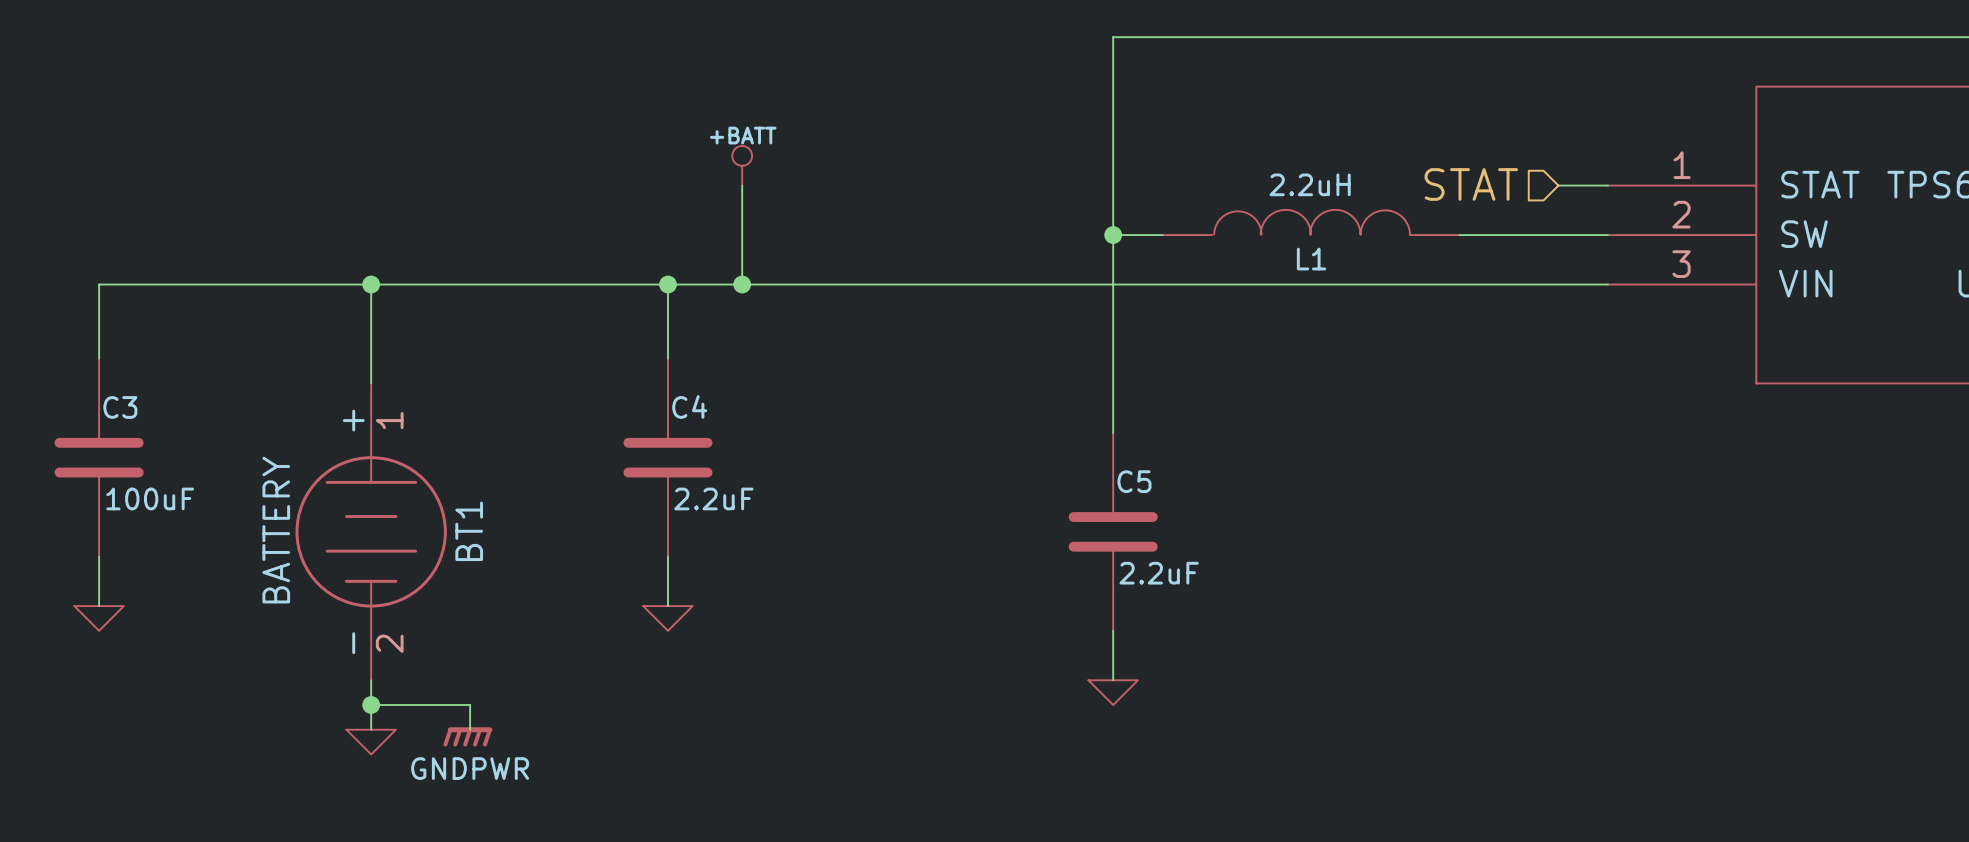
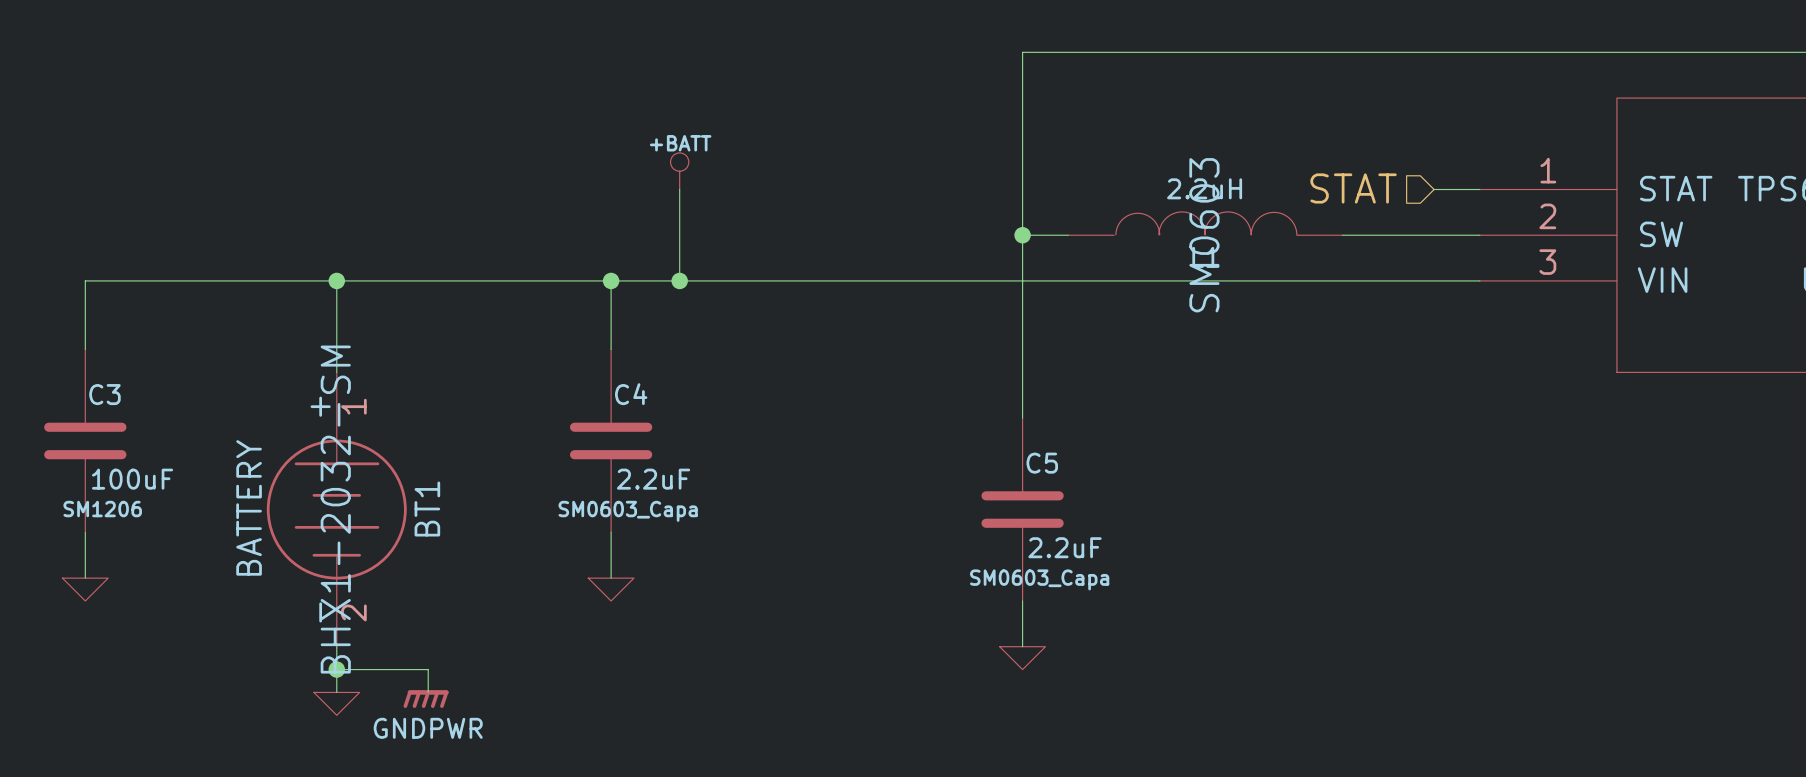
L1 text: none -> SM0603 (1204, 235)
C3 text: none -> SM1206 (102, 509)
BT1 text: none -> BHX1-2032-SM (335, 509)
C4 text: none -> SM0603_Capa (628, 511)
C5 text: none -> SM0603_Capa (1039, 579)

